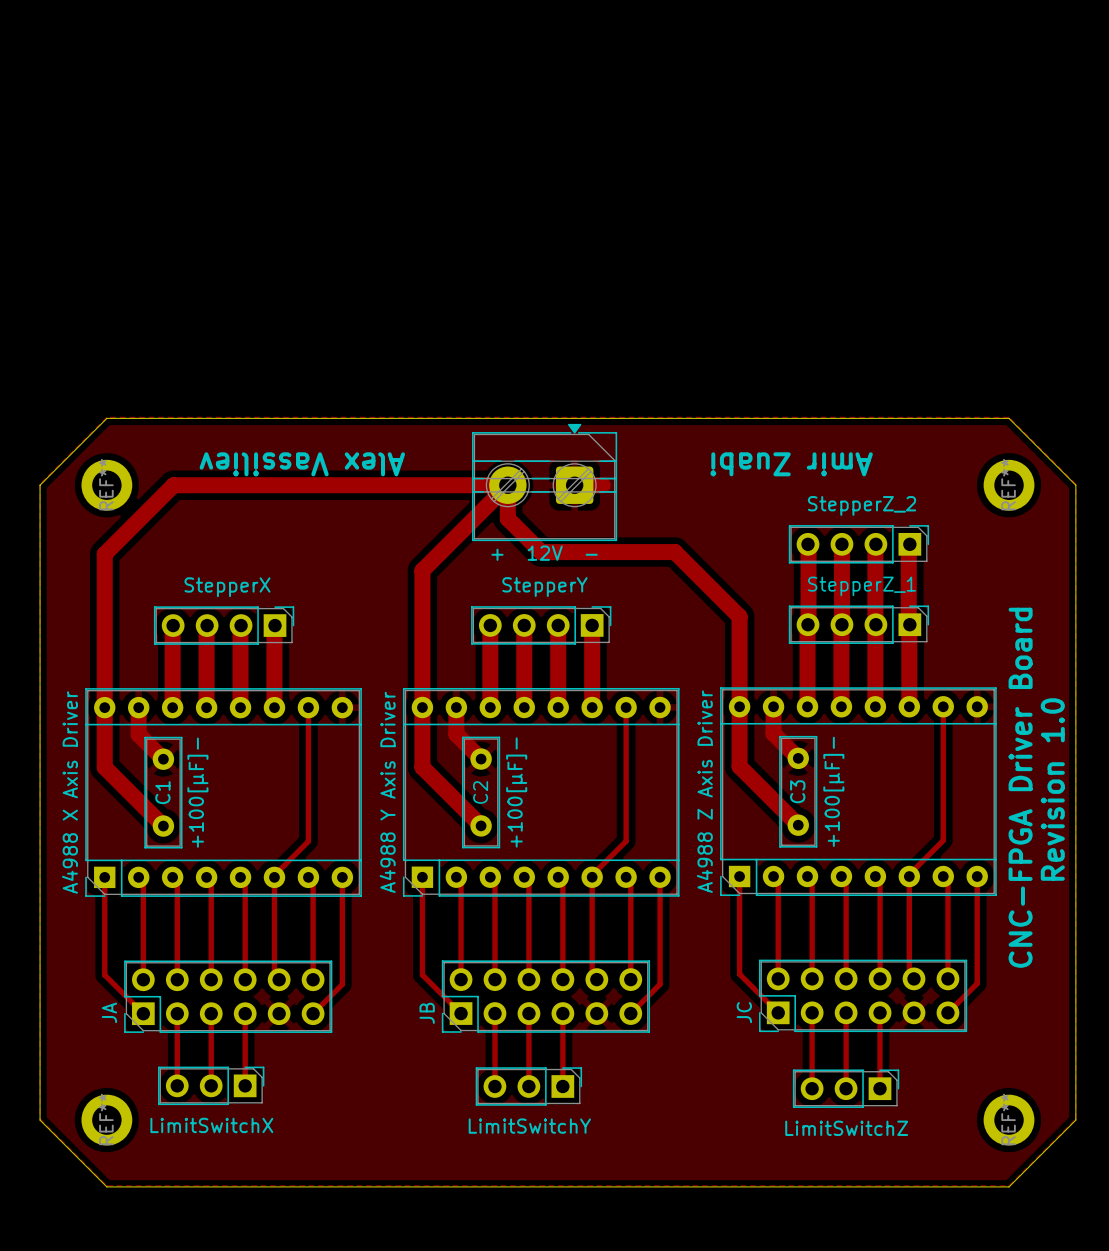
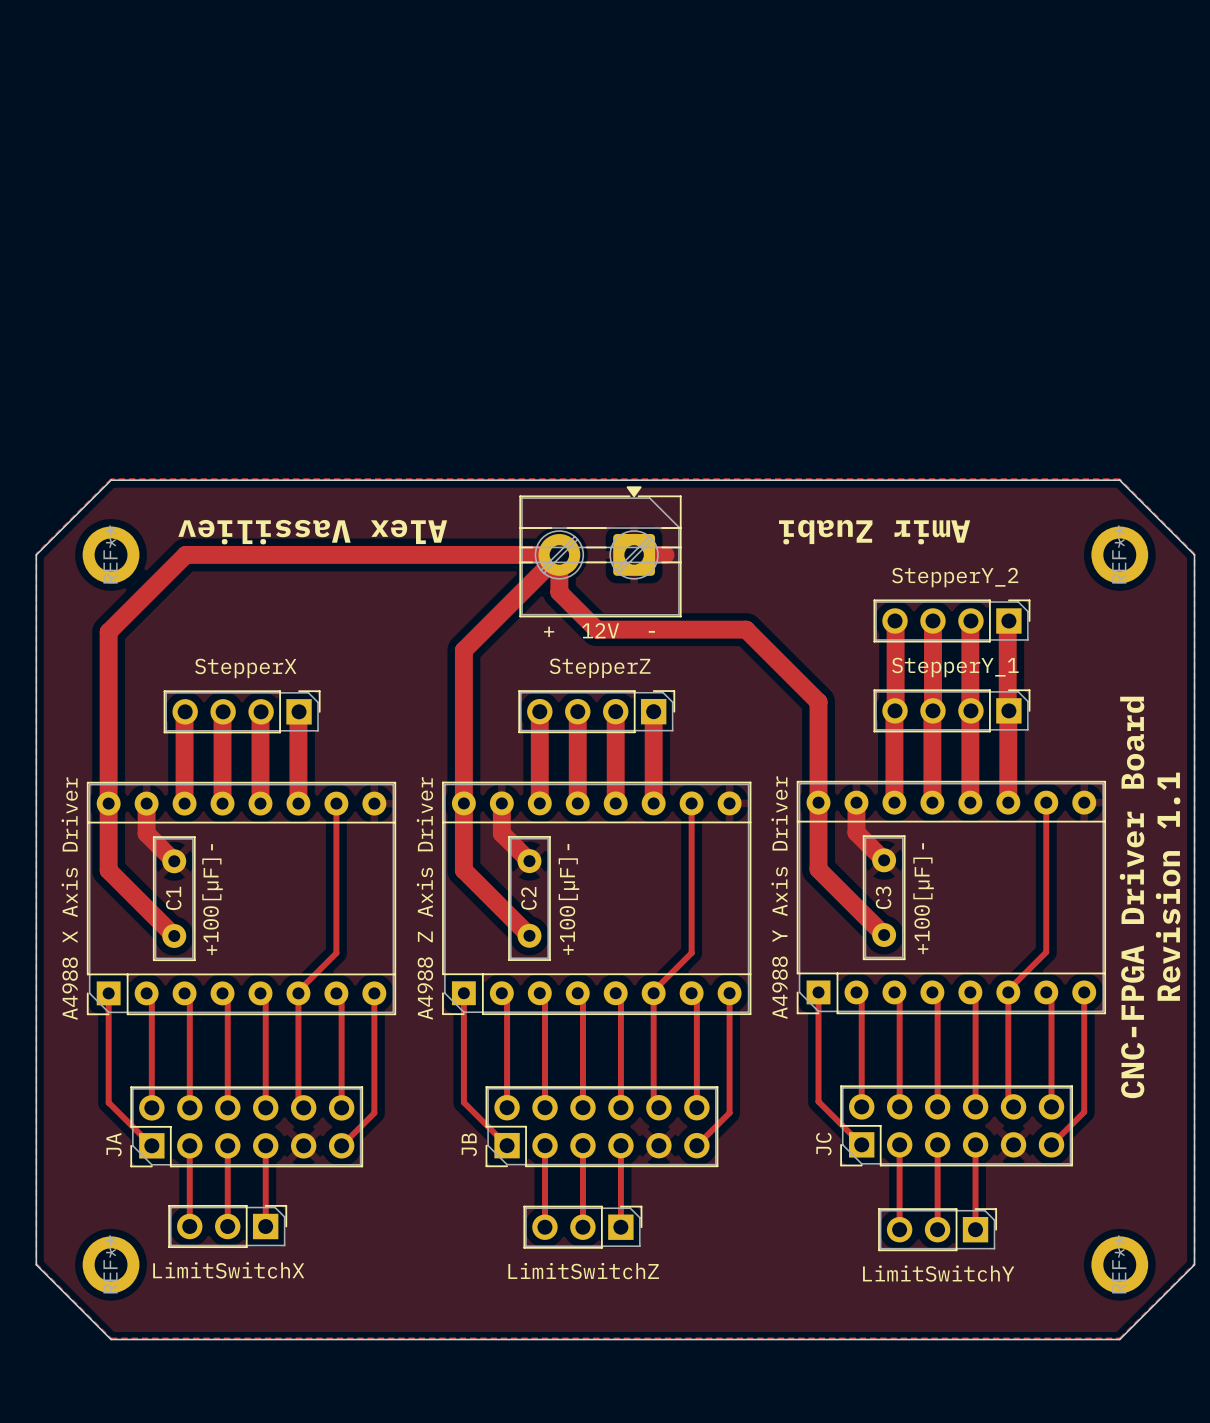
StepperZ_2 name: StepperZ_2 (862, 505) -> StepperY_2 (955, 577)
StepperZ_1 name: StepperZ_1 (862, 586) -> StepperY_1 (955, 667)
StepperY name: StepperY (544, 587) -> StepperZ (600, 668)
text: Revision 1.0 (1052, 789) -> Revision 1.1 (1168, 886)
A4988 Z Axis Driver name: A4988 Z Axis Driver (704, 791) -> A4988 Y Axis Driver (779, 897)
A4988 Y Axis Driver name: A4988 Y Axis Driver (387, 792) -> A4988 Z Axis Driver (424, 898)
LimitSwitchY name: LimitSwitchY (529, 1126) -> LimitSwitchZ (583, 1271)
LimitSwitchZ name: LimitSwitchZ (846, 1128) -> LimitSwitchY (938, 1273)

